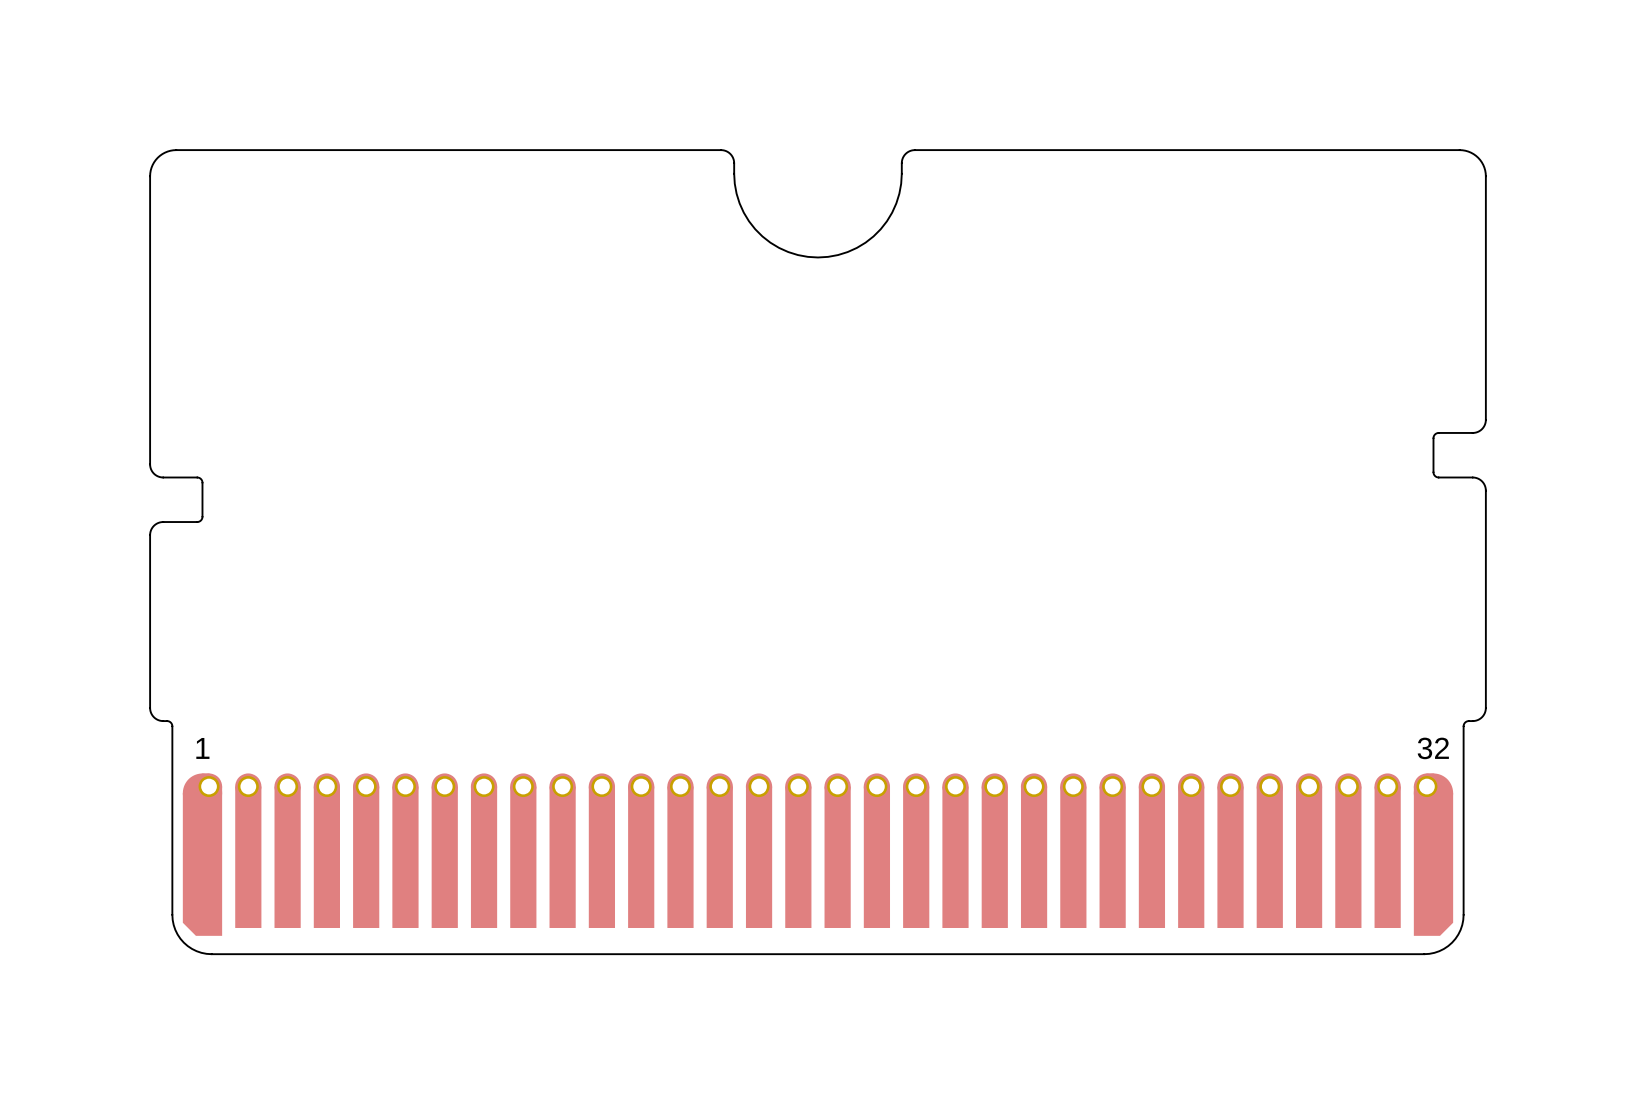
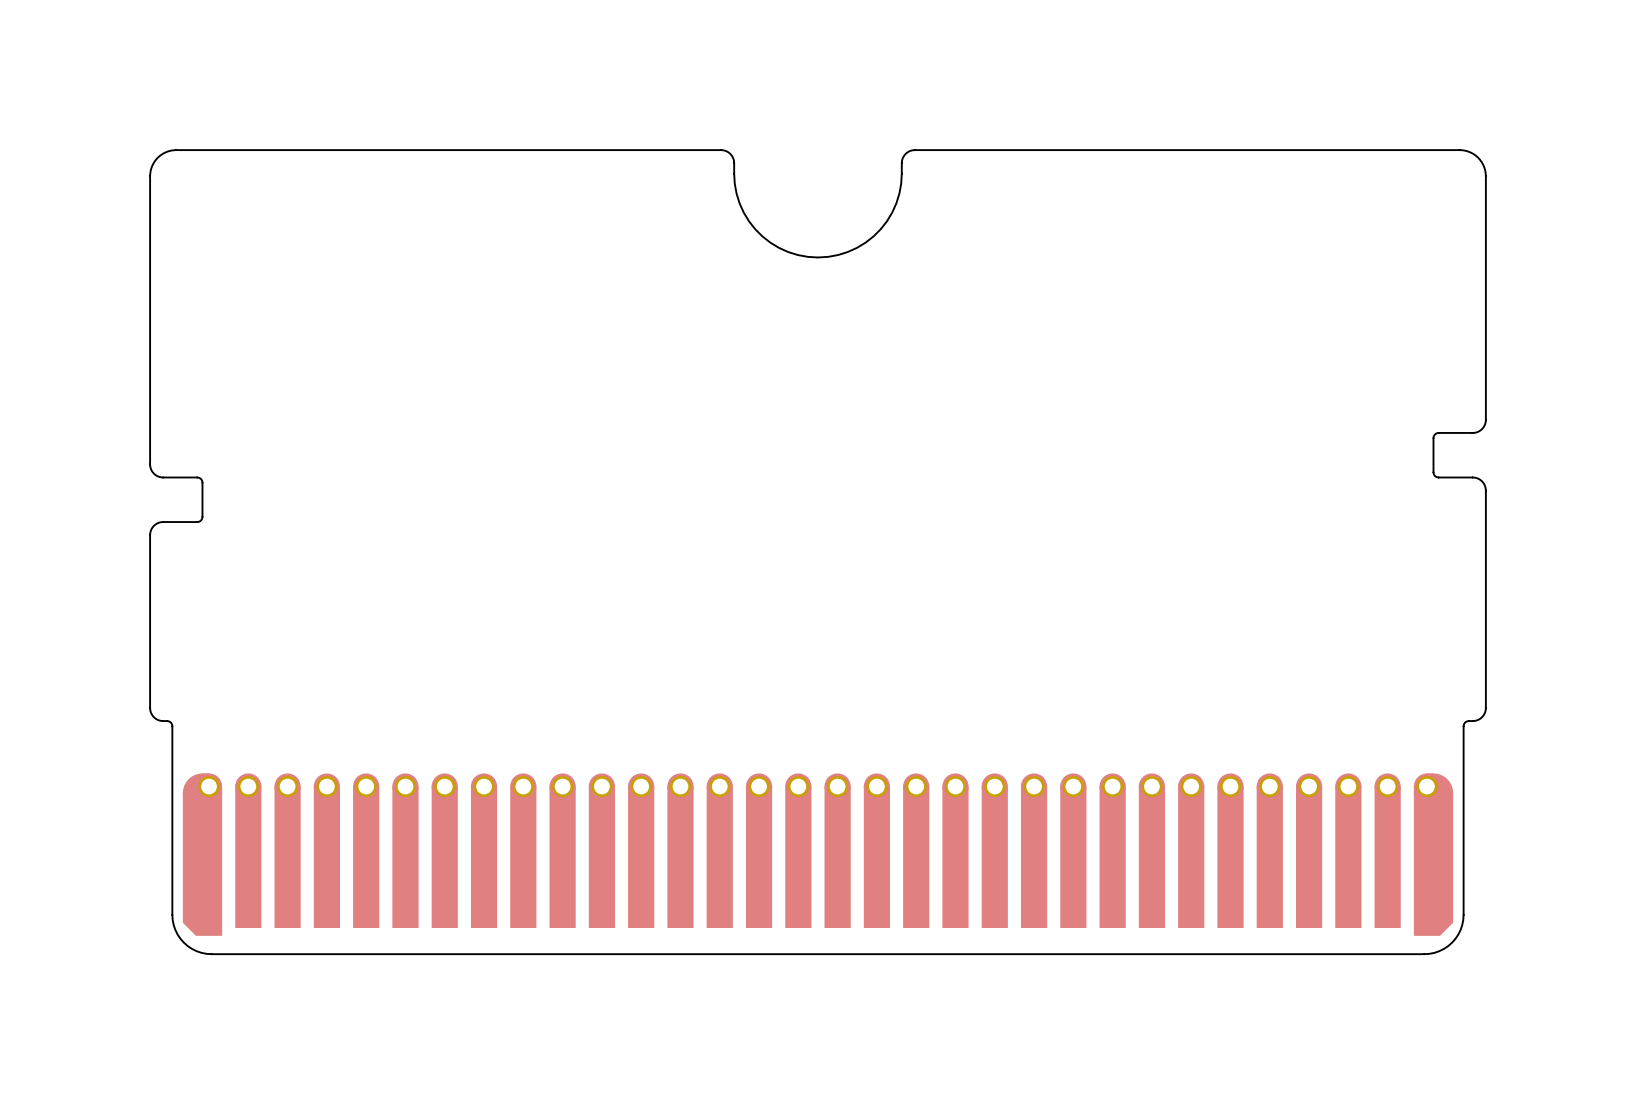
part text: 1 (202, 748) -> none
part text: 32 (1433, 748) -> none

